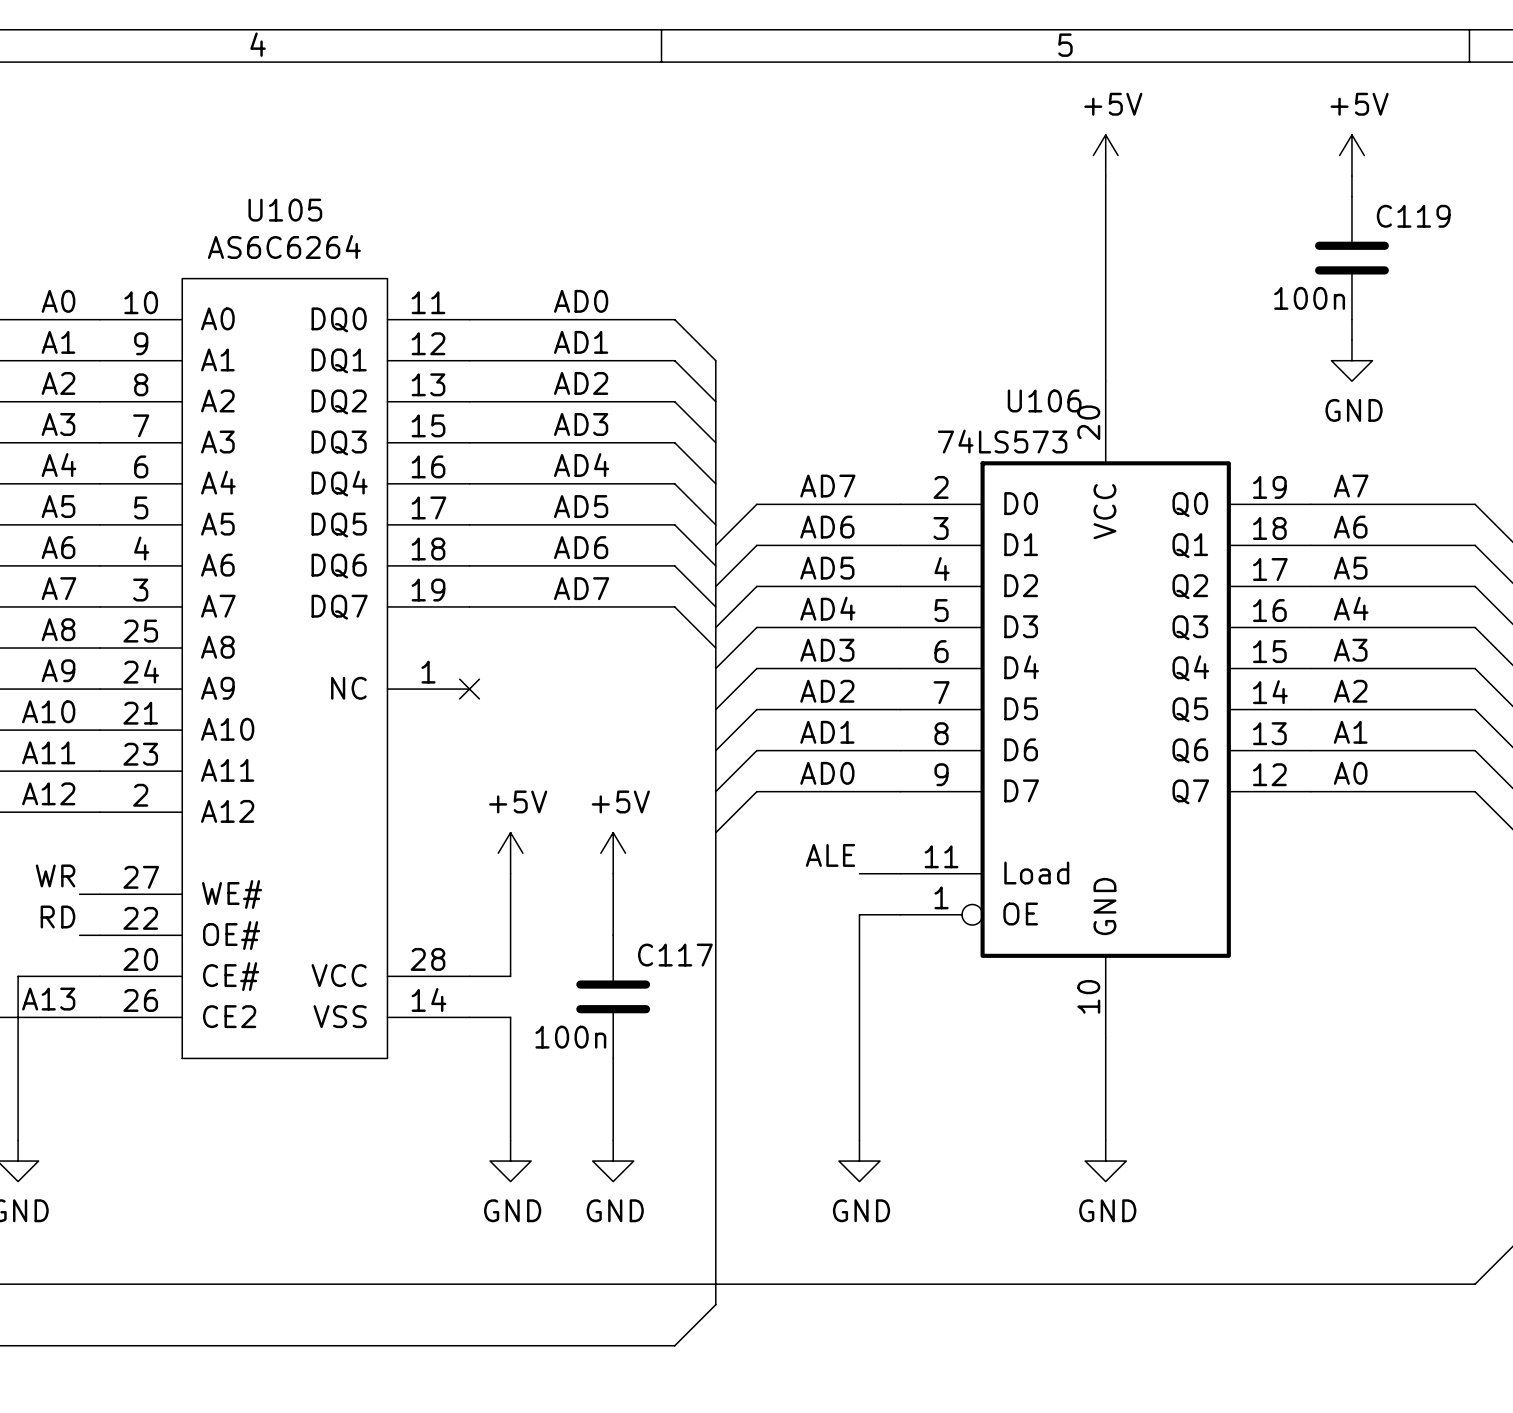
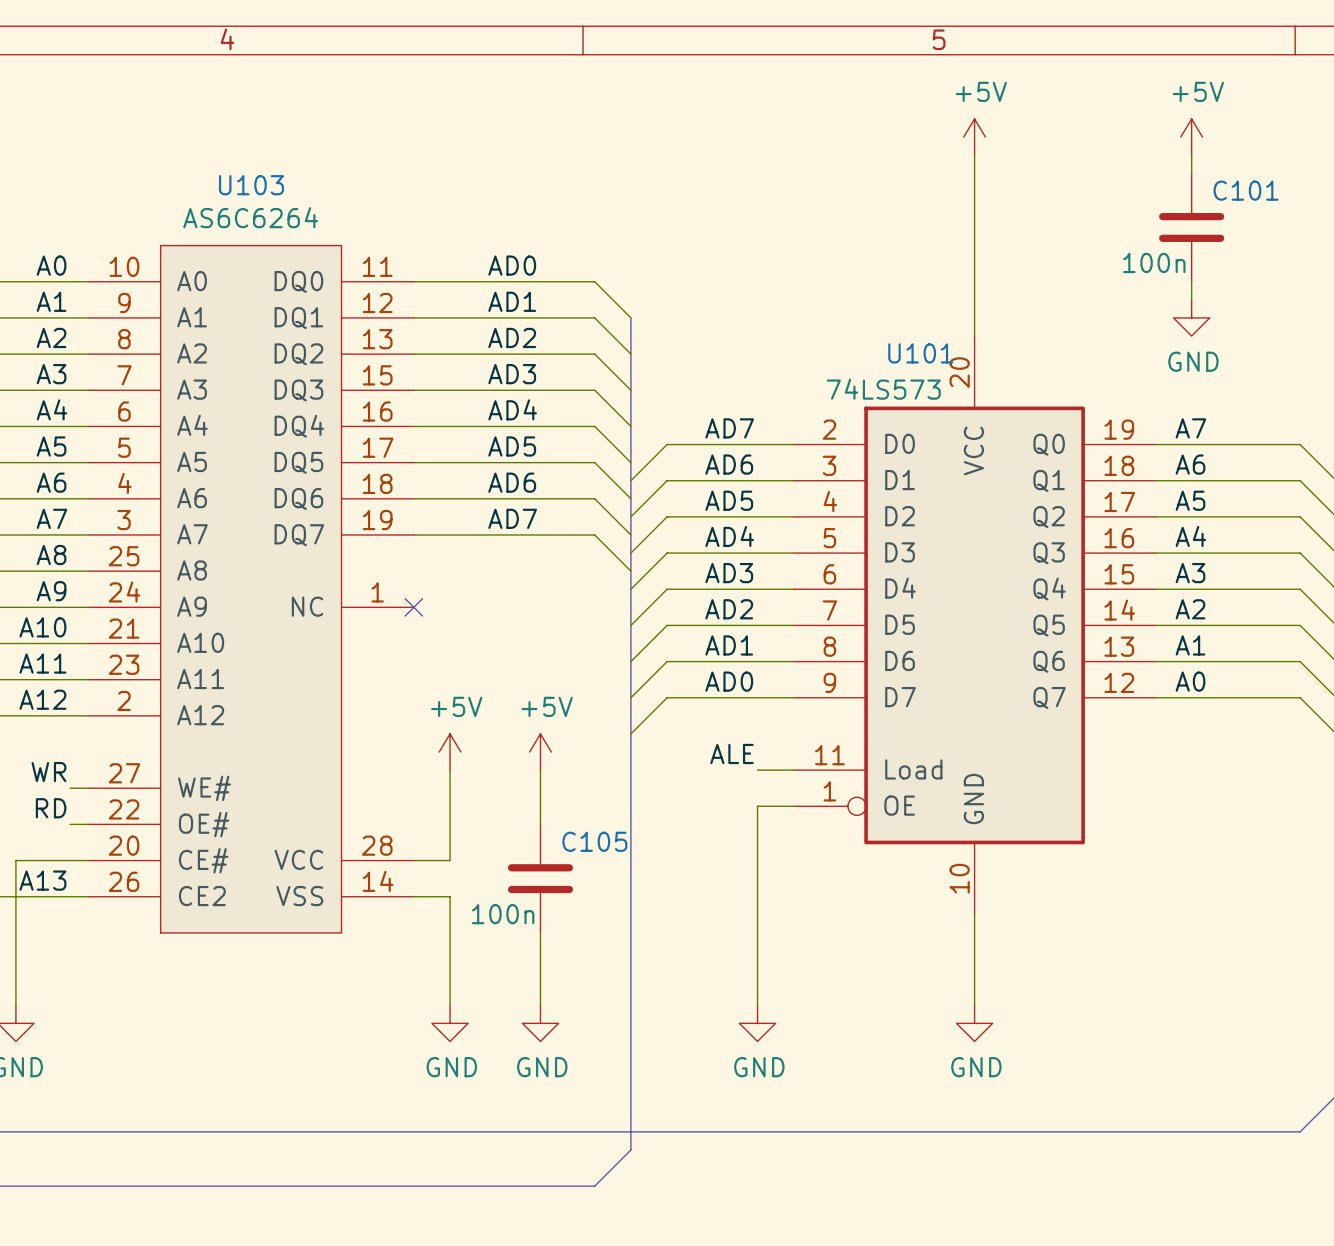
U105 name: U105 (285, 210) -> U103 (251, 185)
C119 name: C119 (1413, 216) -> C101 (1246, 190)
U106 name: U106 (1044, 400) -> U101 (920, 353)
C117 name: C117 (675, 955) -> C105 (594, 841)

